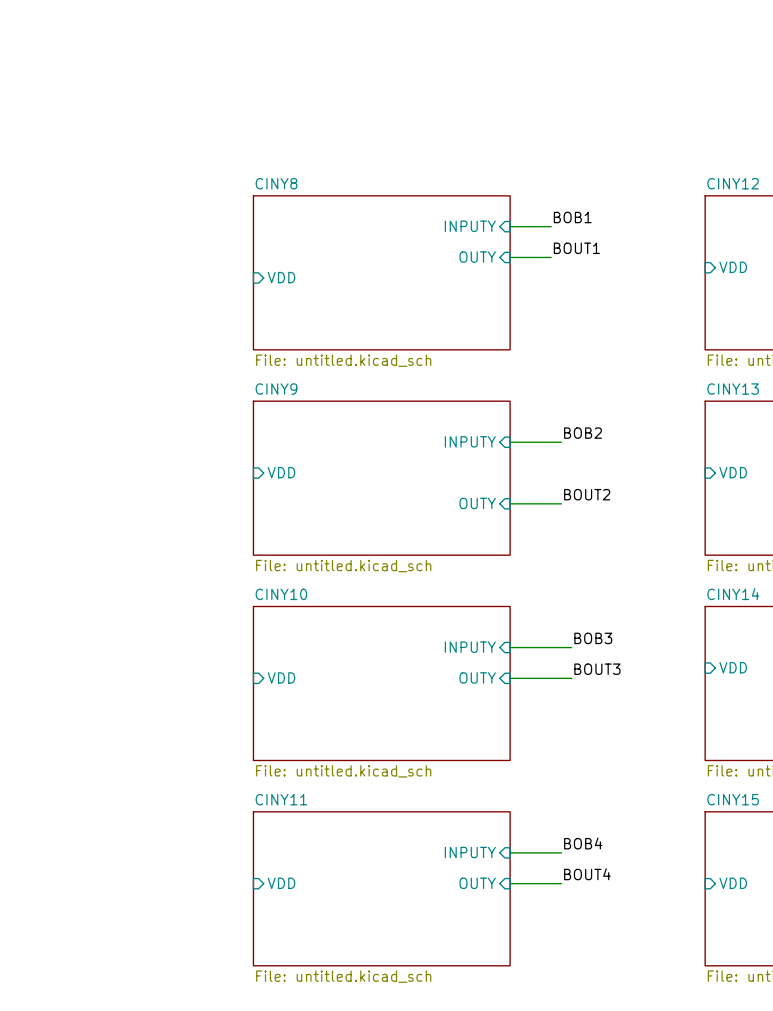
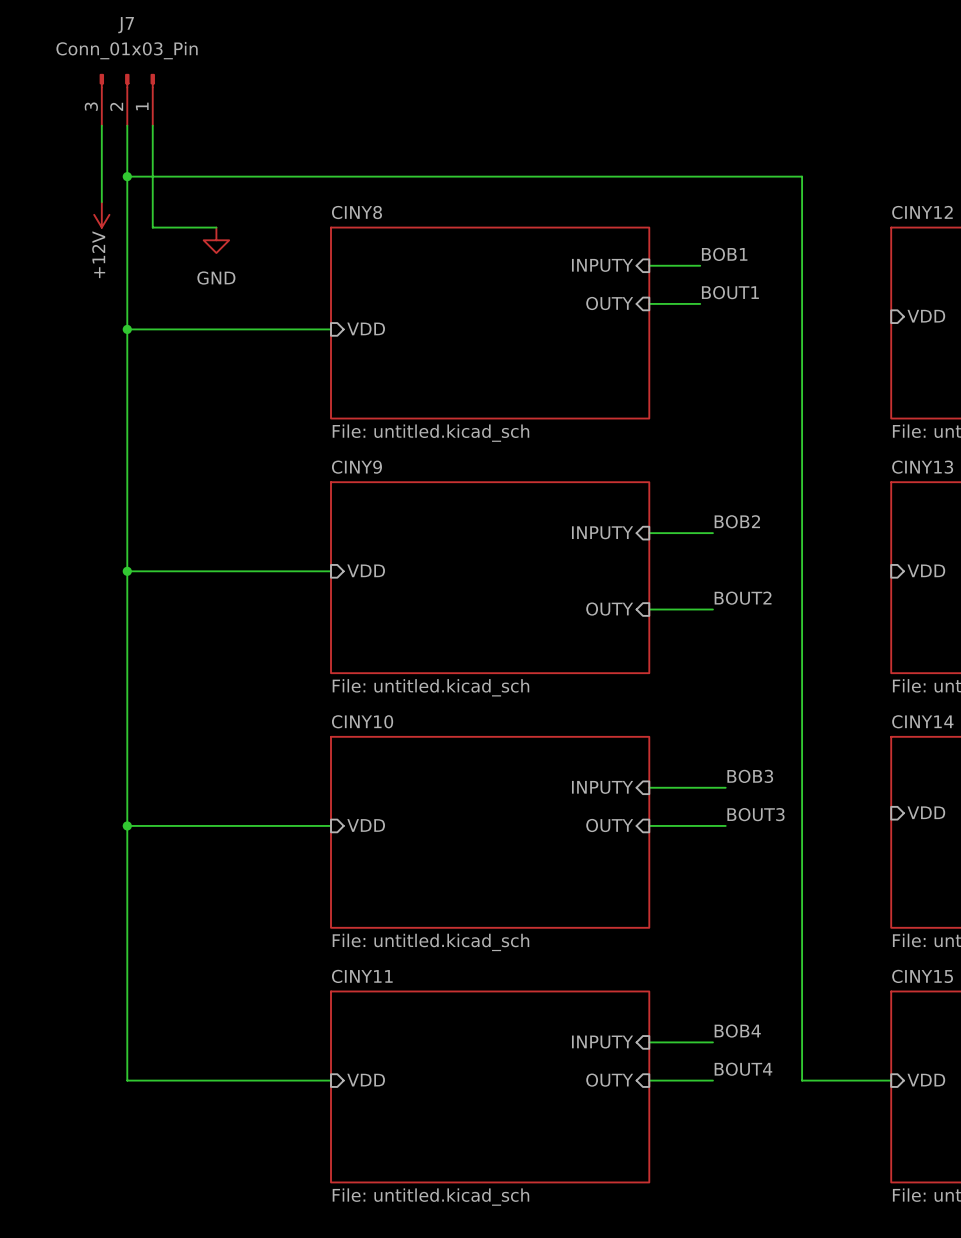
J7: none -> Conn_01x03_Pin (127, 99)
wire: none -> (101, 125) (101, 202)
wire: none -> (127, 125) (127, 1080) (331, 1080)
wire: none -> (152, 125) (152, 227) (216, 227)
wire: none -> (127, 176) (802, 176) (802, 1080) (891, 1080)
junction: none -> (127, 176)
power symbol: none -> +12V (101, 214)
power symbol: none -> GND (216, 240)
wire: none -> (127, 329) (331, 329)
junction: none -> (127, 329)
wire: none -> (127, 571) (331, 571)
junction: none -> (127, 571)
wire: none -> (127, 825) (331, 825)
junction: none -> (127, 825)

